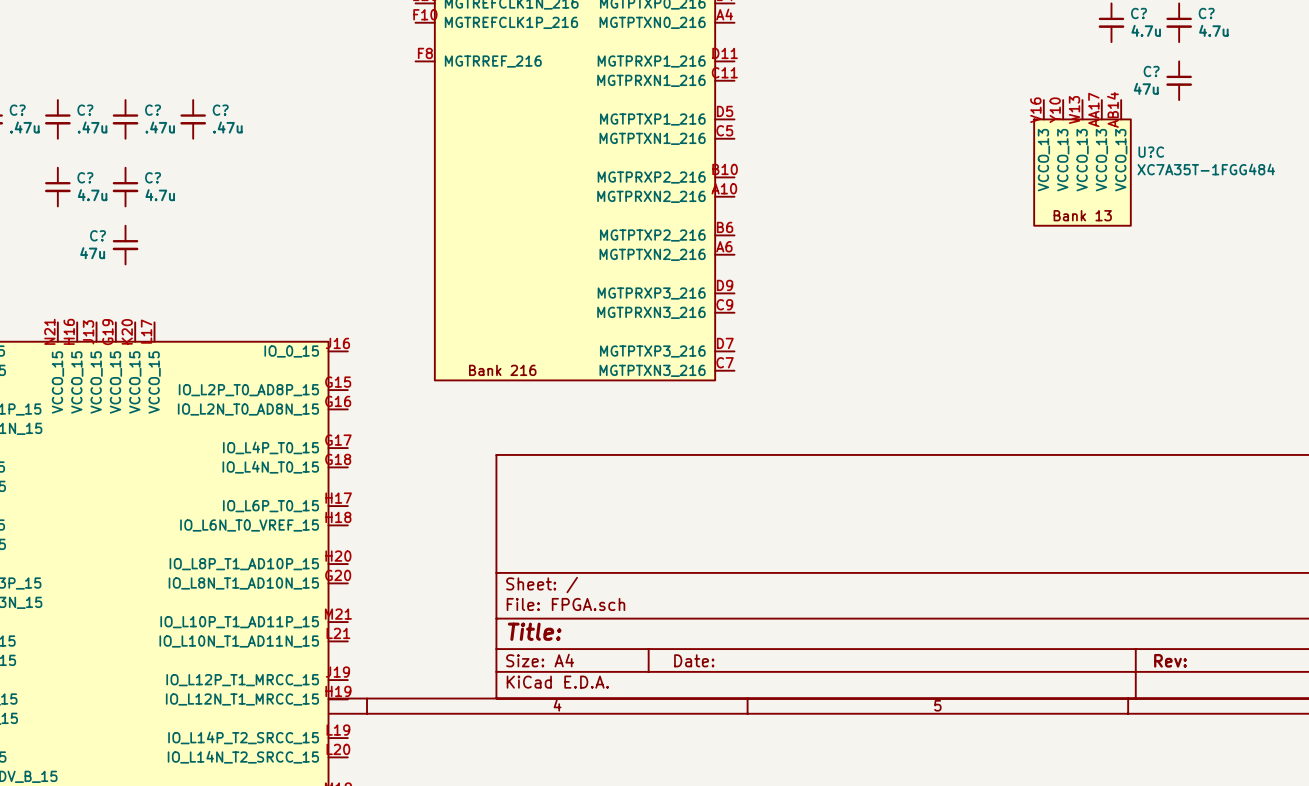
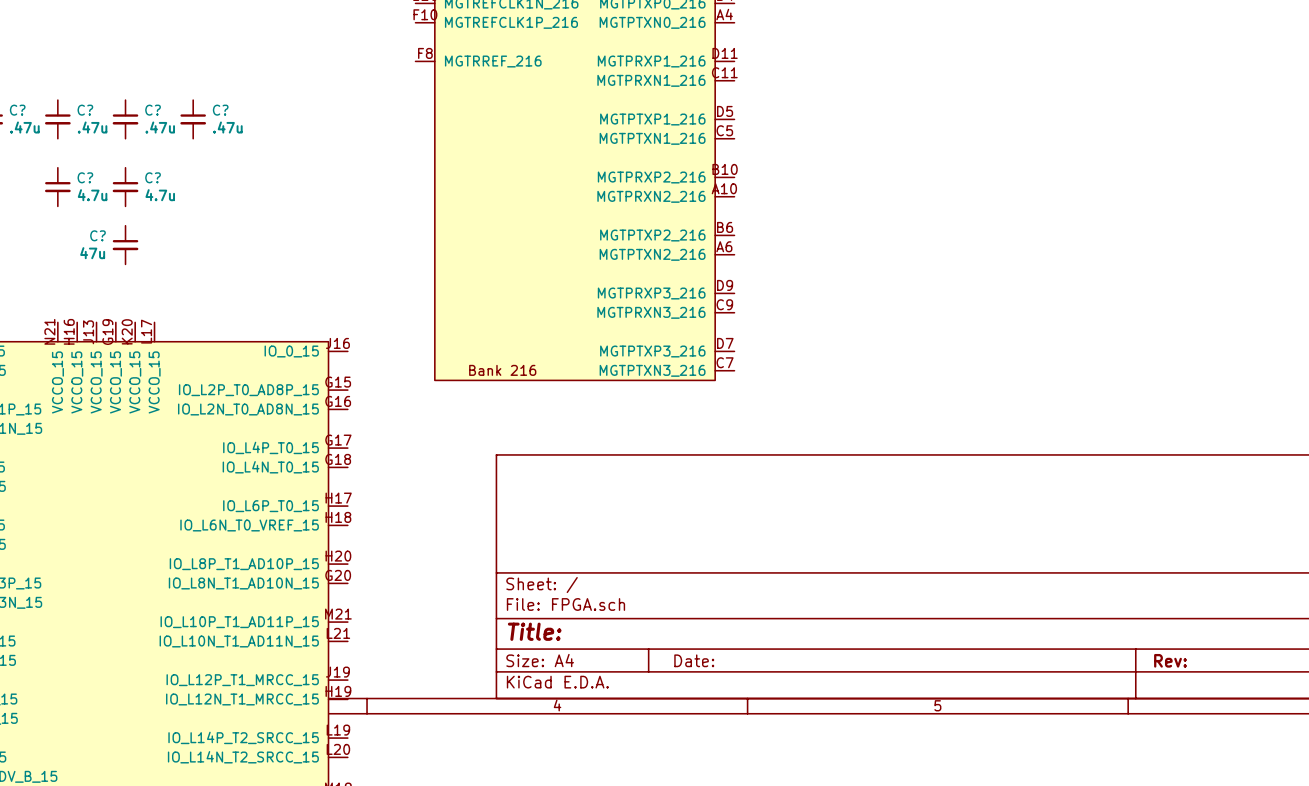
C?: 4.7u (1111, 22) -> none
C?: 4.7u (1179, 22) -> none
C?: 47u (1179, 80) -> none
U?C: XC7A35T-1FGG484 (1082, 162) -> none

